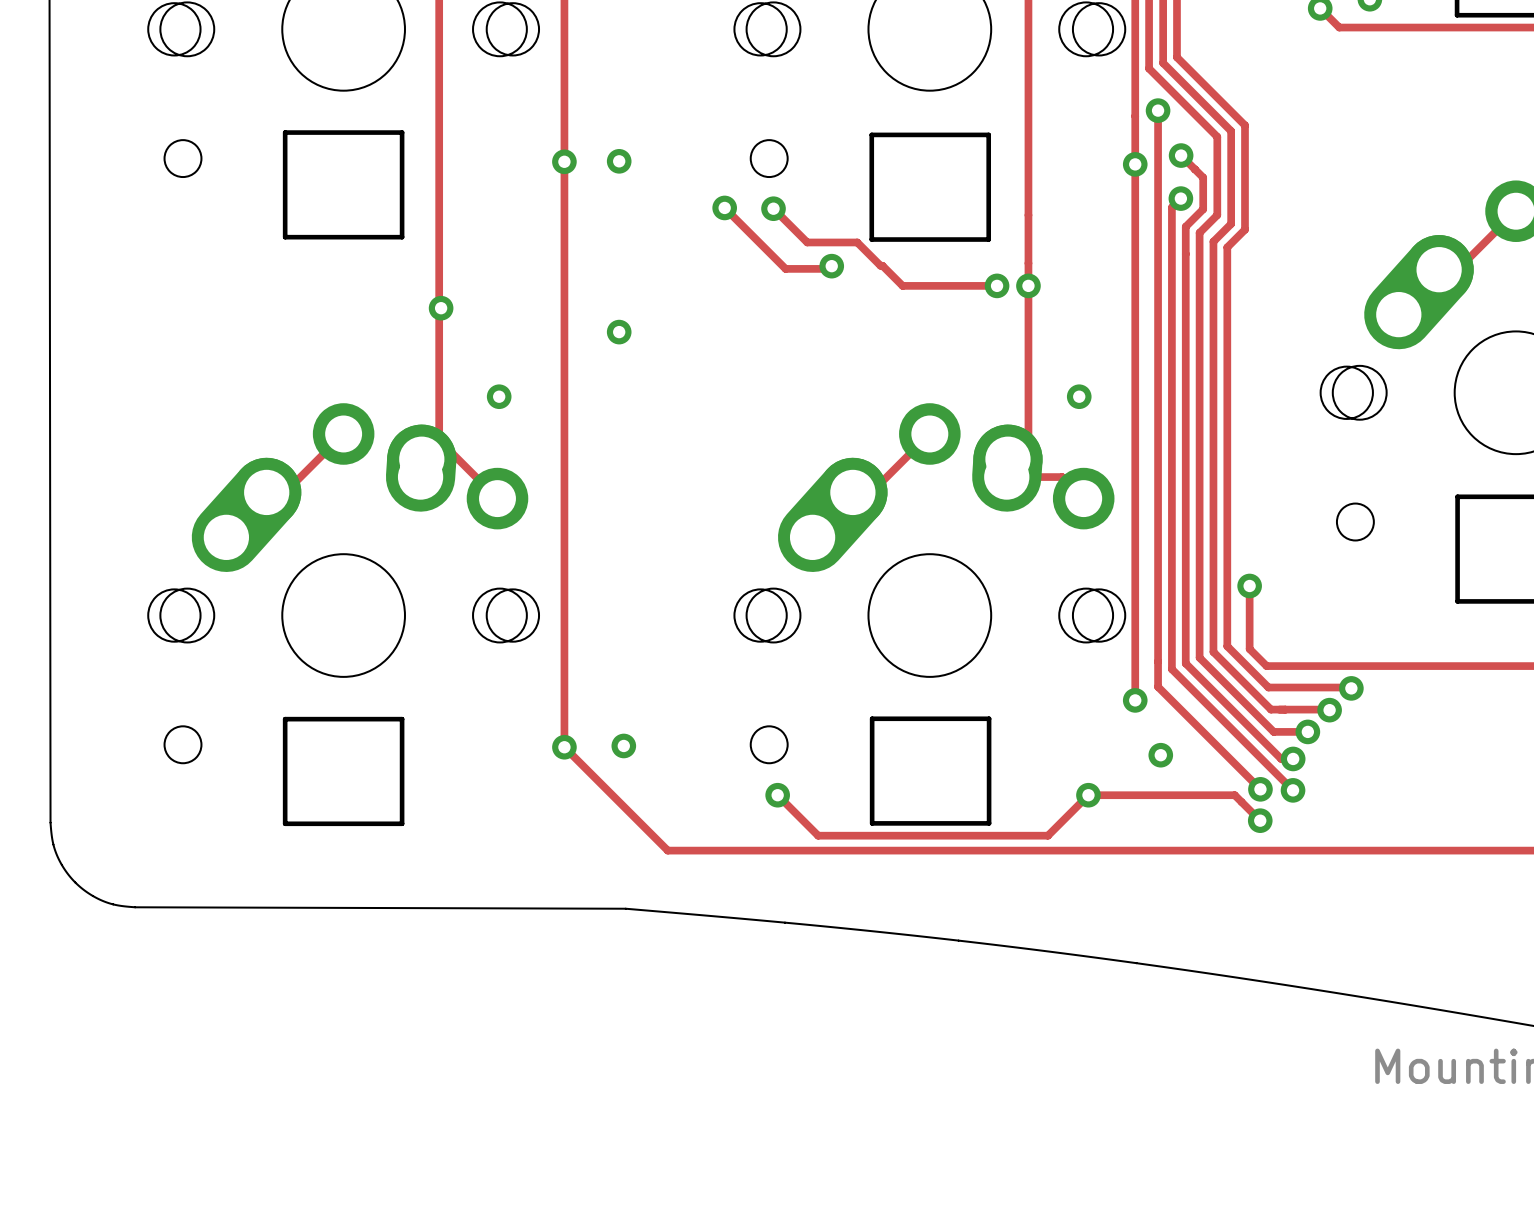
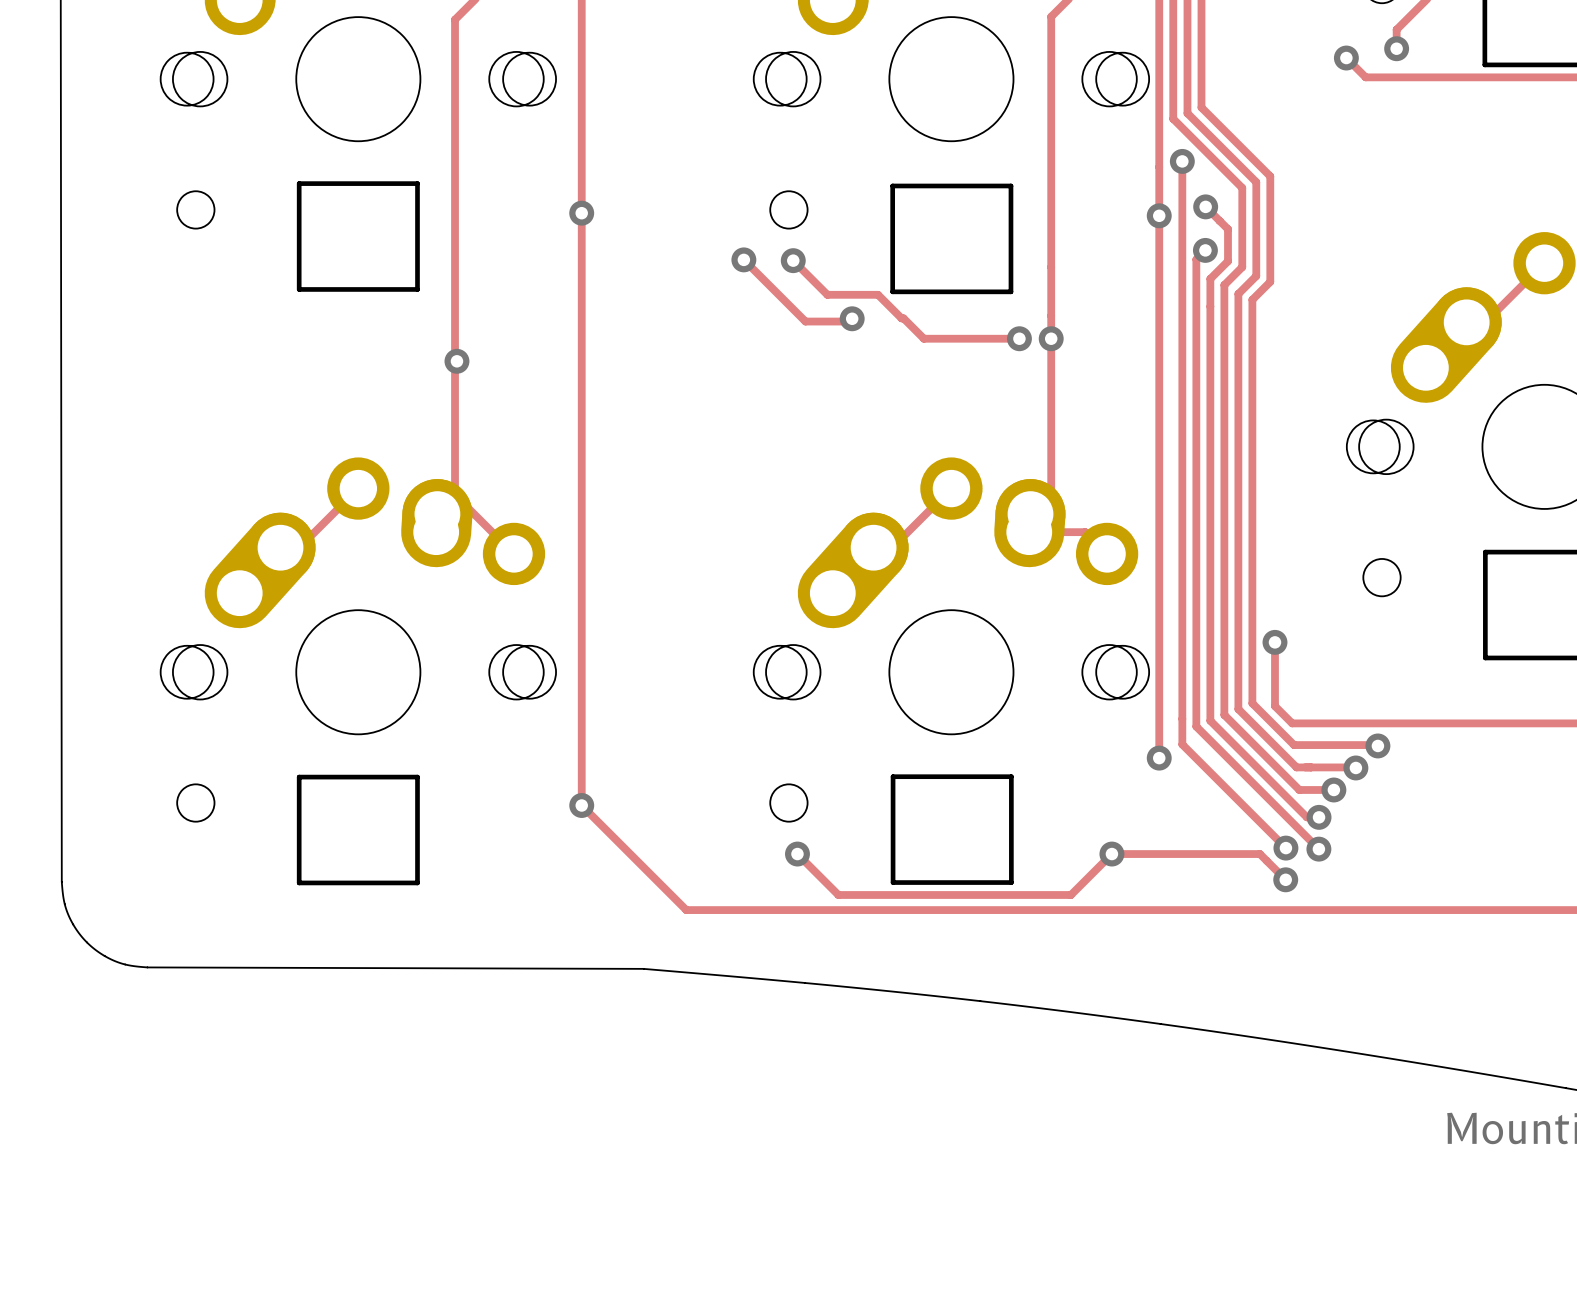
via: (619, 161) -> none
via: (619, 332) -> none
via: (499, 396) -> none
via: (1079, 396) -> none
via: (623, 745) -> none
via: (1160, 755) -> none

